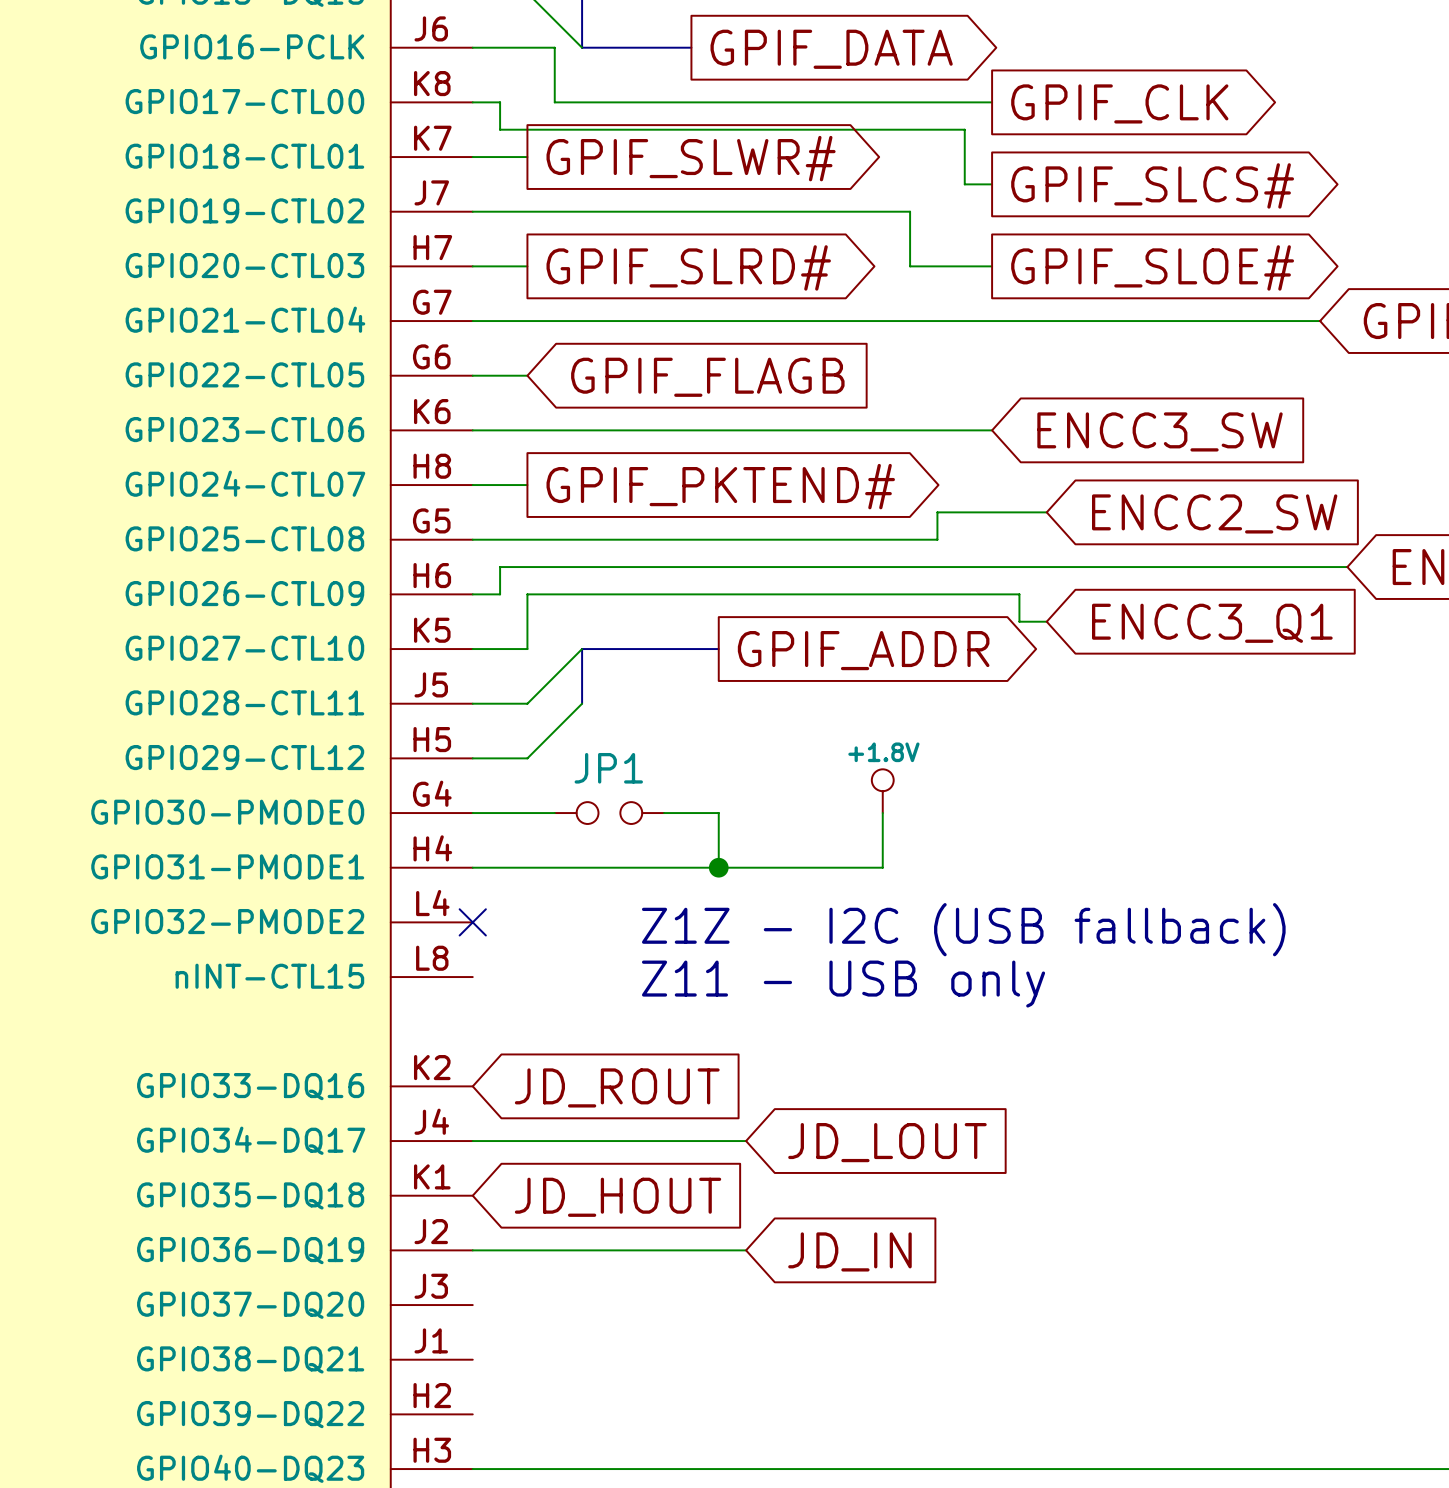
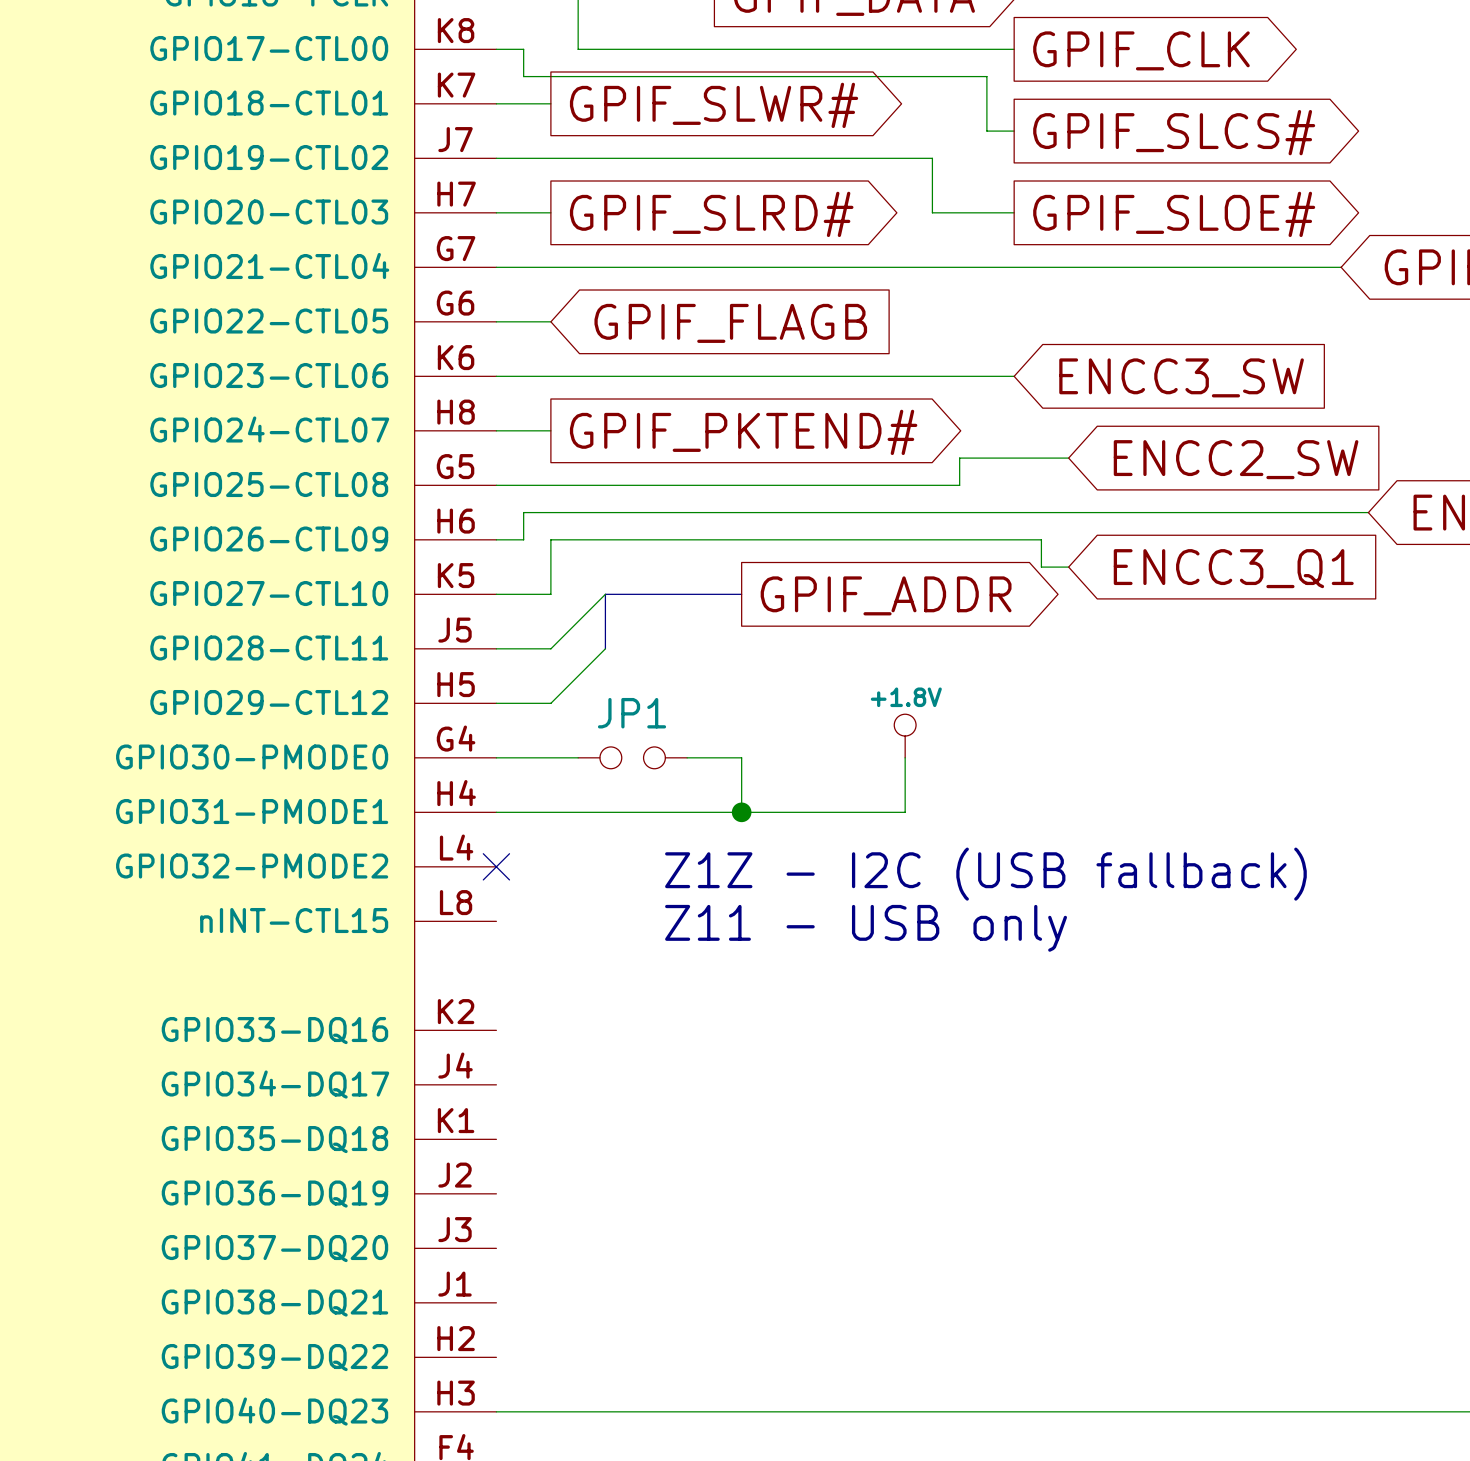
global label: JD_ROUT (617, 1087) -> none
wire: (472, 1141) (746, 1141) -> none
global label: JD_LOUT (887, 1142) -> none
global label: JD_HOUT (618, 1197) -> none
wire: (472, 1250) (746, 1250) -> none
global label: JD_IN (849, 1251) -> none

